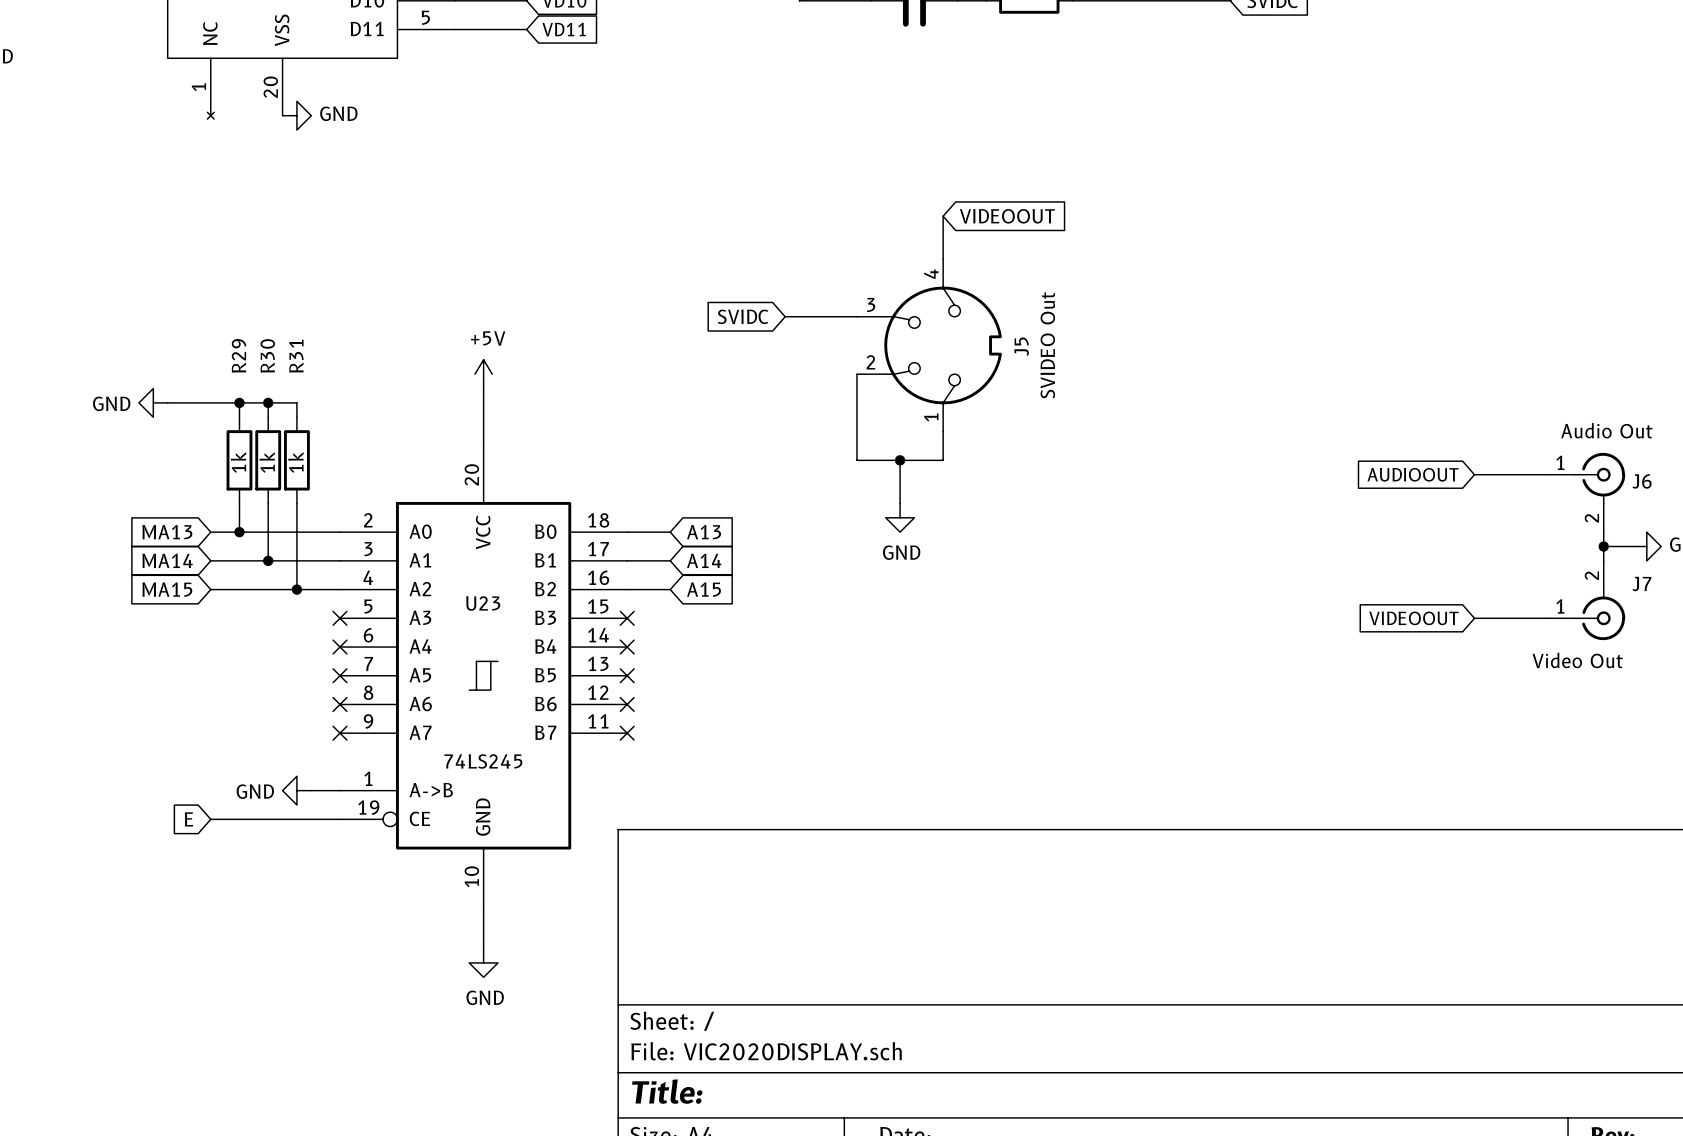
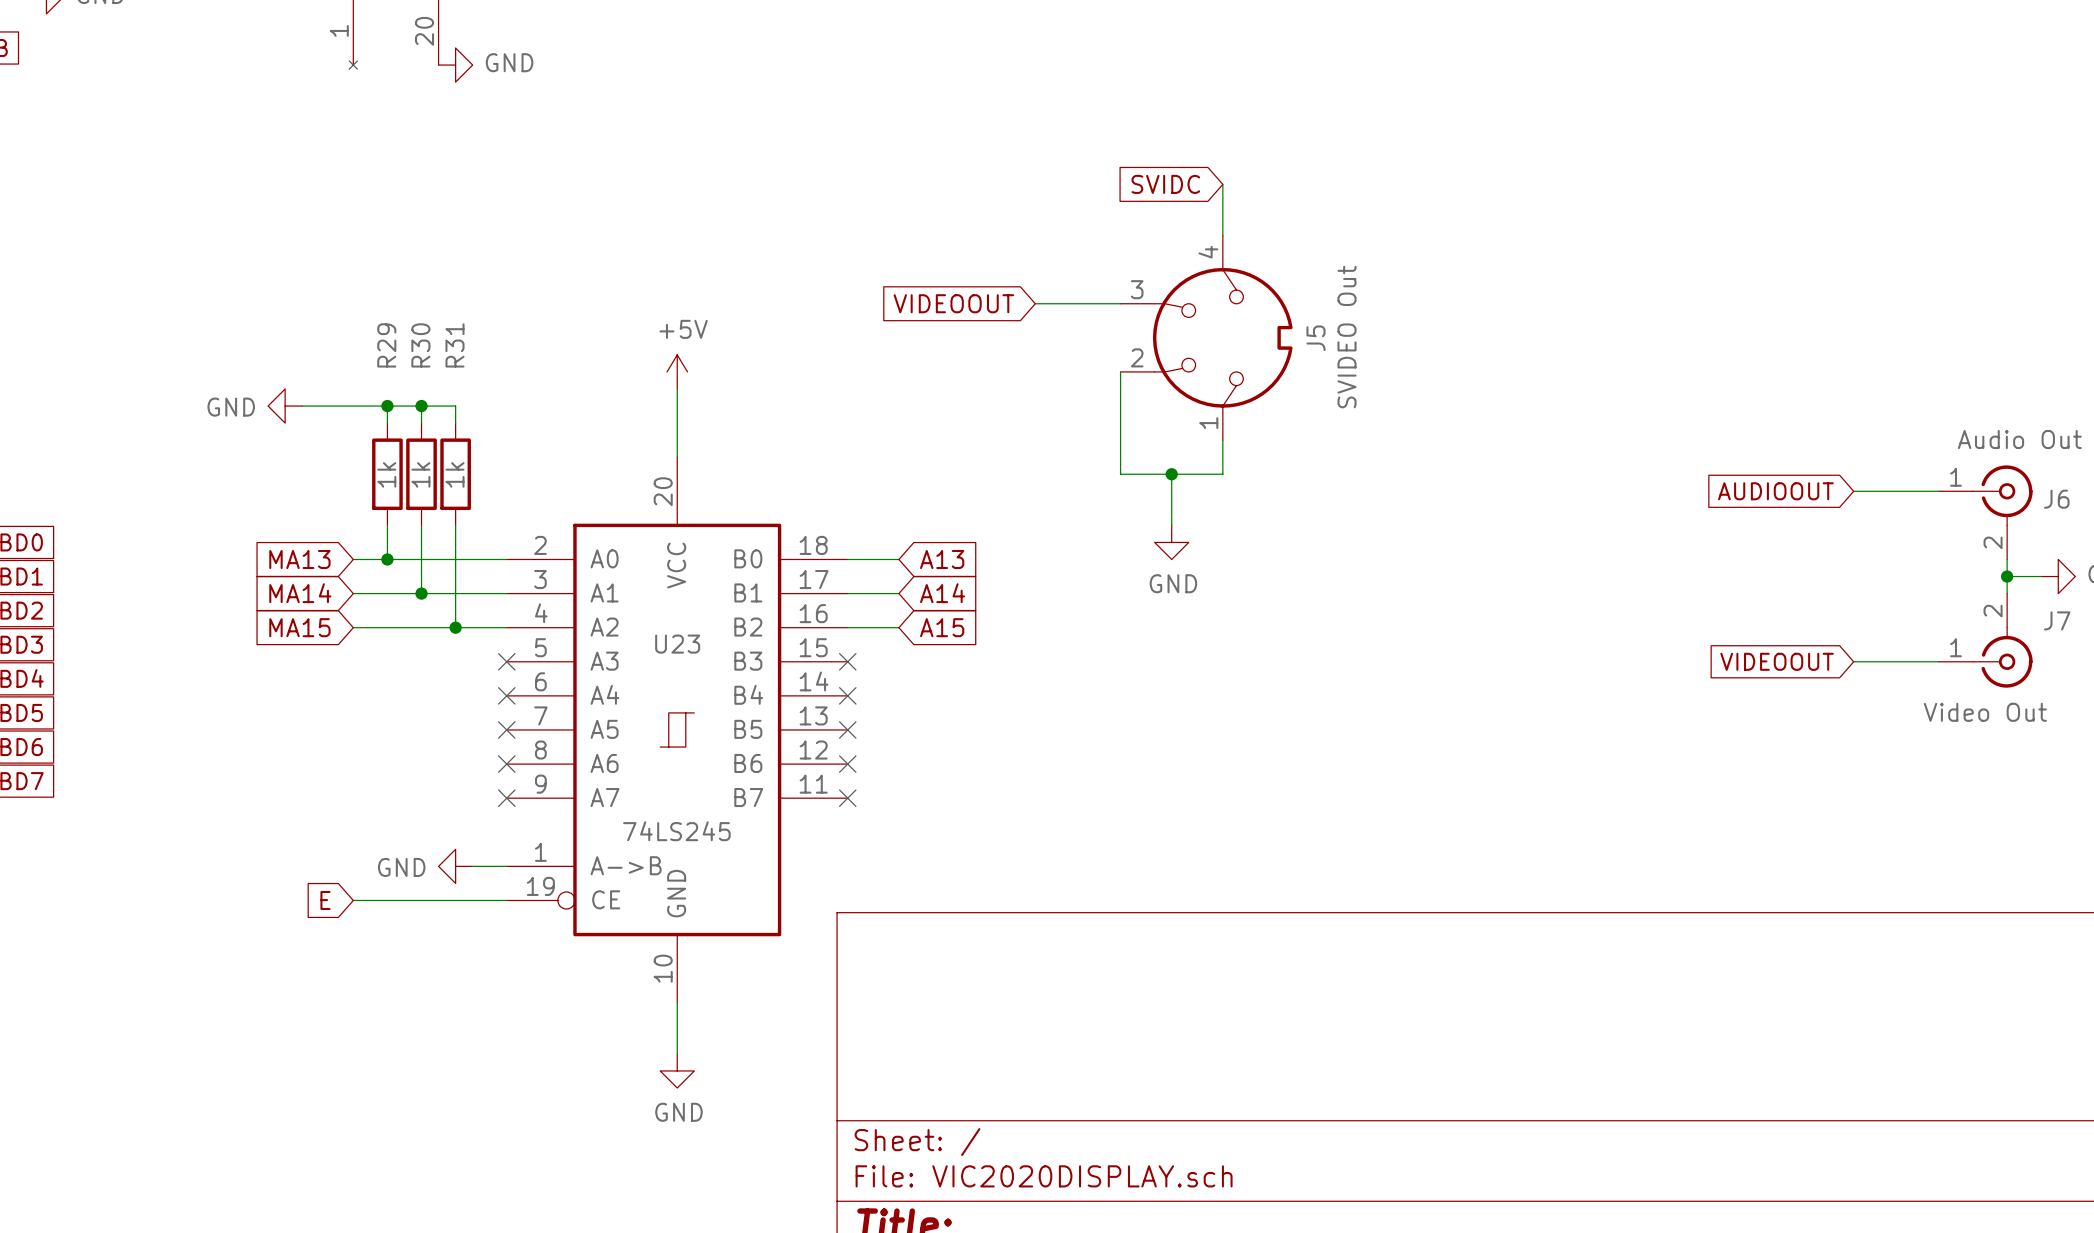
global label: VIDEOOUT (1007, 216) -> SVIDC (1165, 184)
global label: SVIDC (743, 316) -> VIDEOOUT (953, 303)

